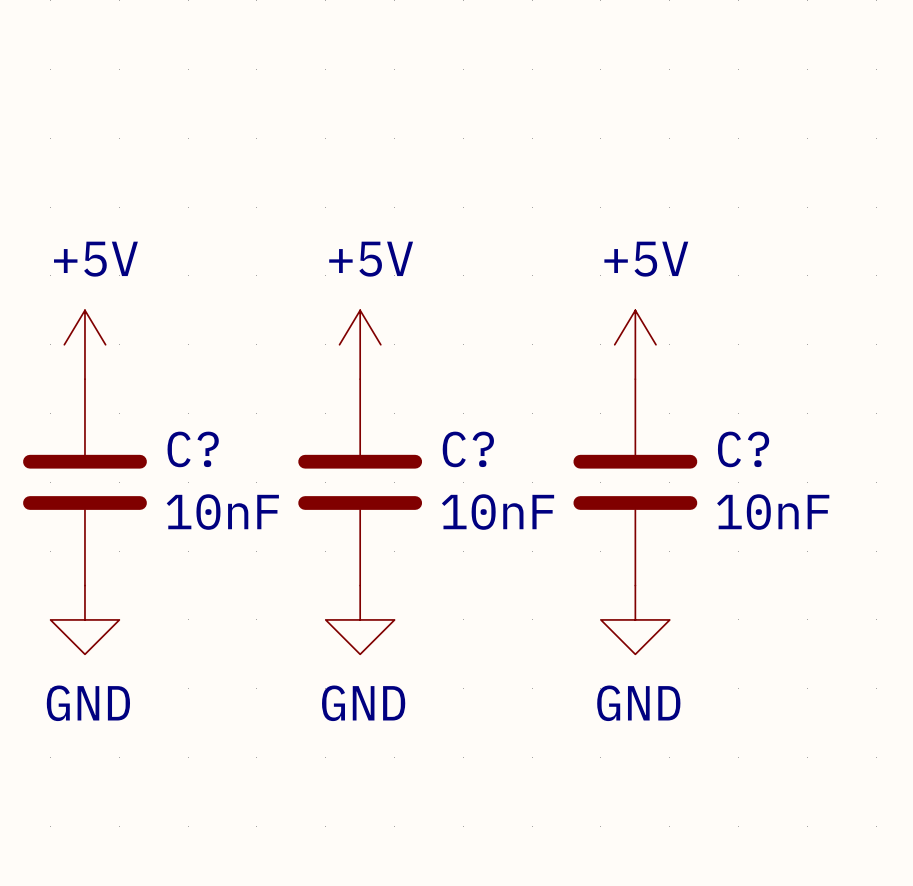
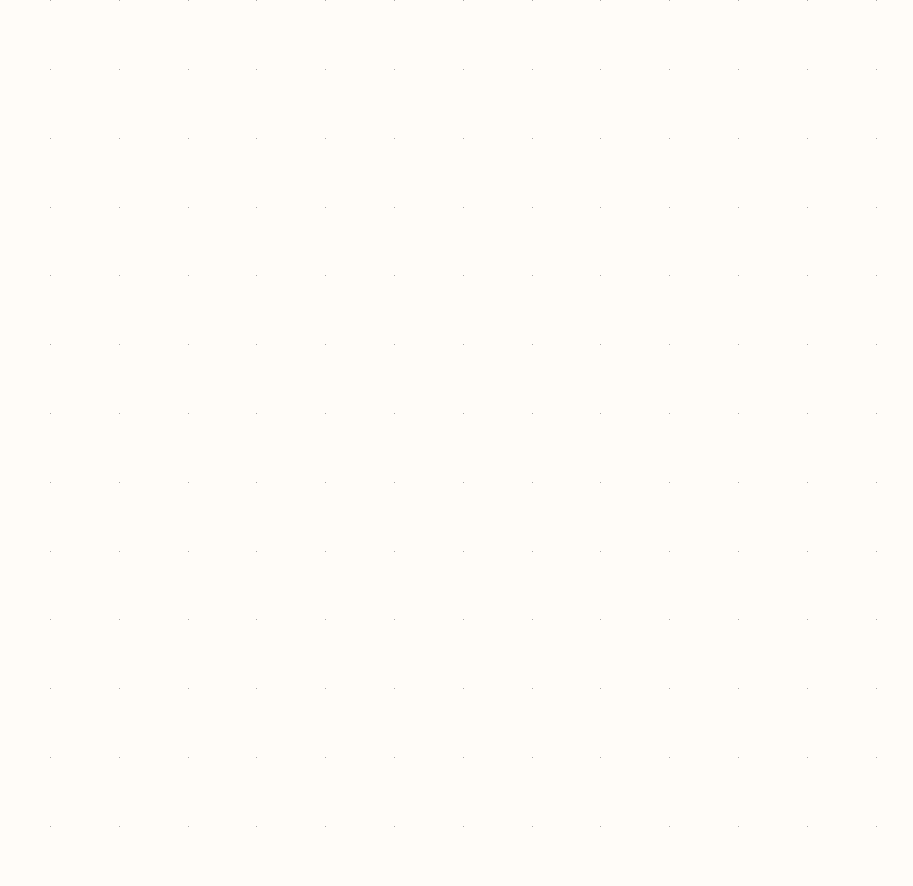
power symbol: +5V (84, 344) -> none
power symbol: +5V (360, 344) -> none
power symbol: +5V (635, 344) -> none
C?: 10nF (84, 482) -> none
C?: 10nF (360, 482) -> none
C?: 10nF (635, 482) -> none
power symbol: GND (84, 619) -> none
power symbol: GND (360, 619) -> none
power symbol: GND (635, 619) -> none

